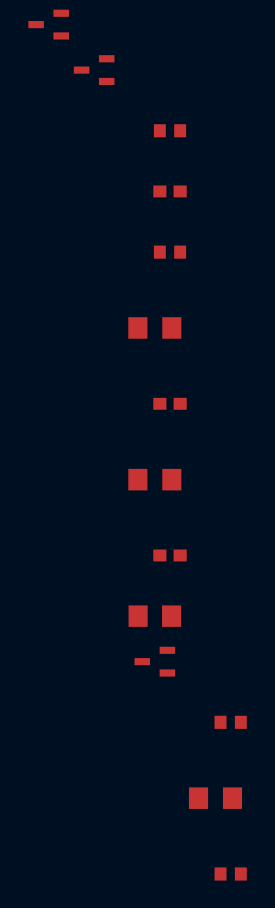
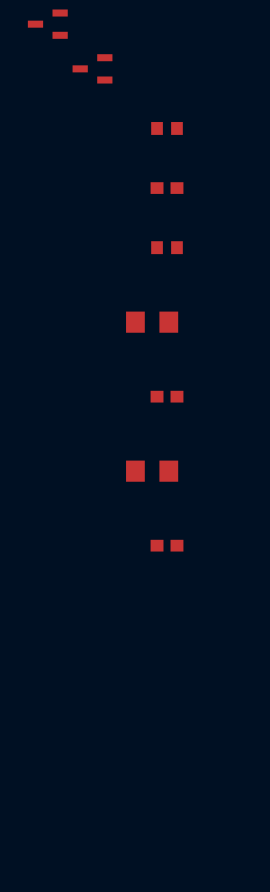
part: (154, 616) -> none
part: (154, 661) -> none
part: (230, 722) -> none
part: (215, 798) -> none
part: (230, 874) -> none

